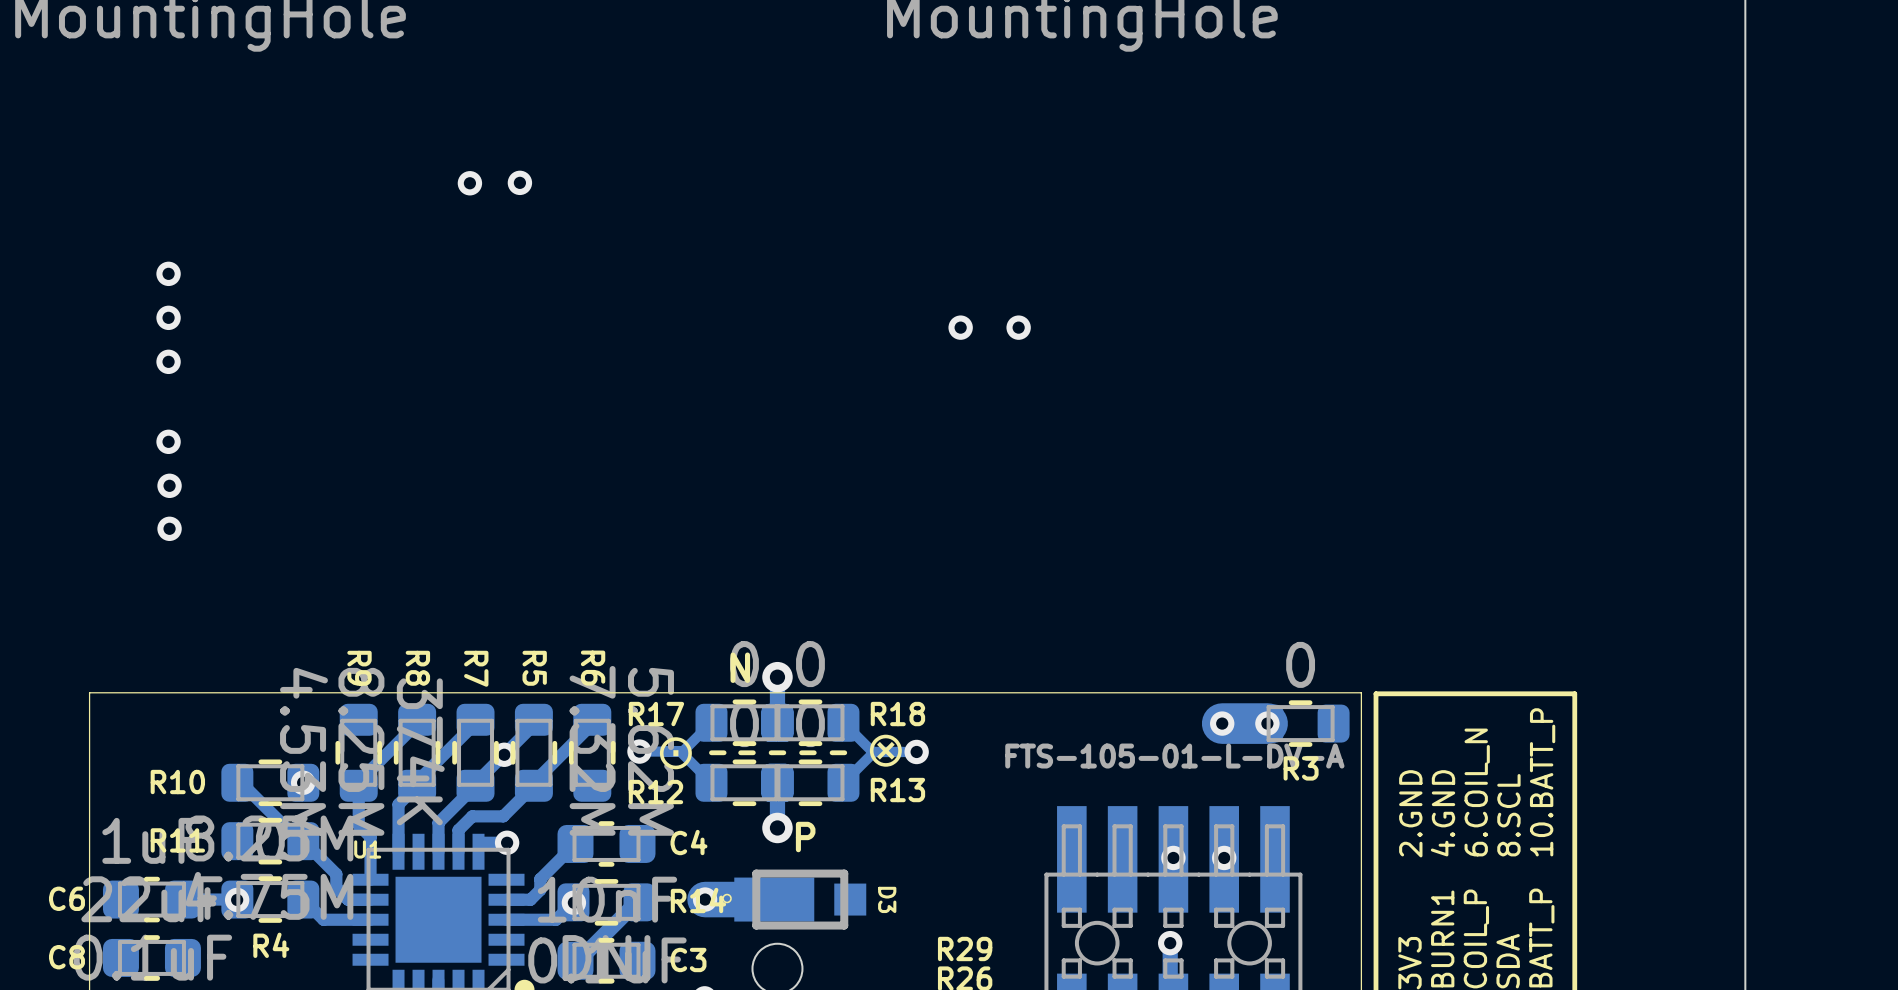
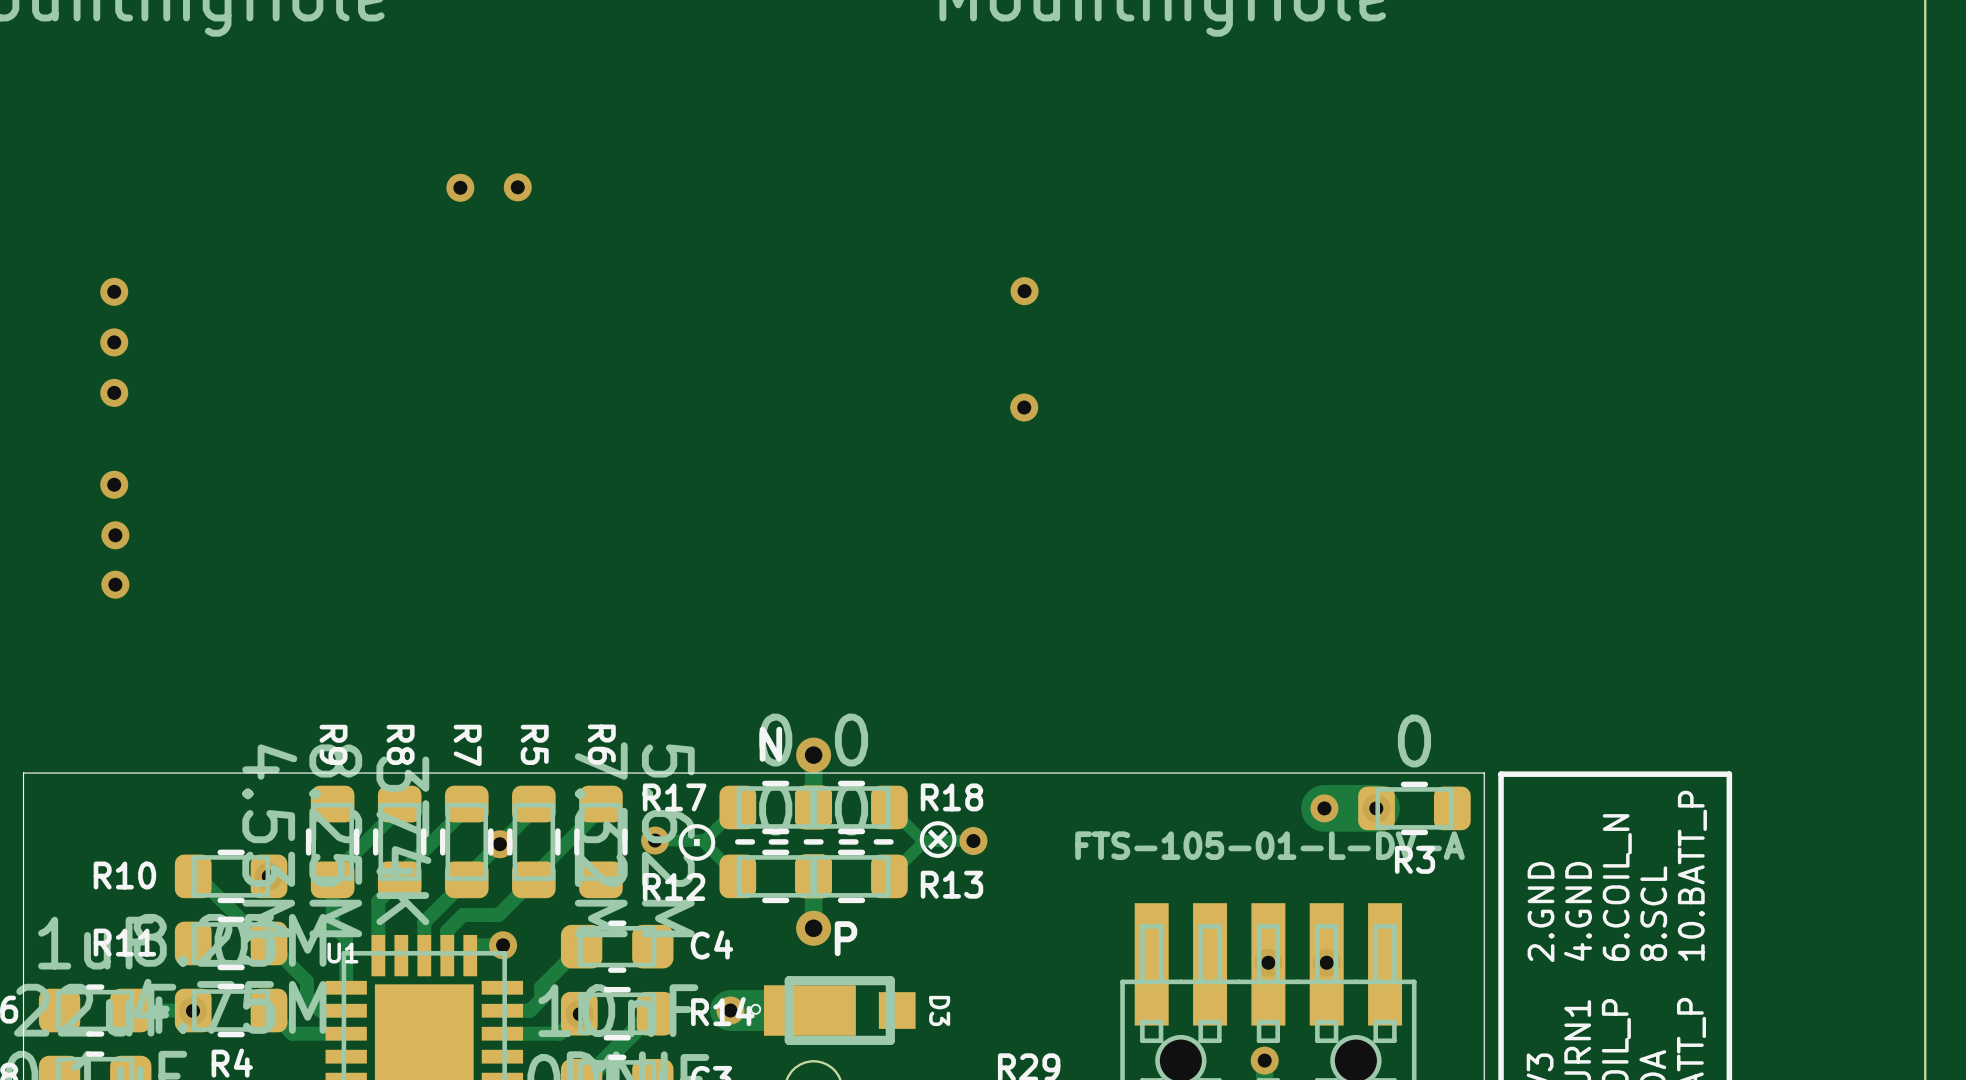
via: none -> (1024, 291)
via: (960, 327) -> none
via: (1018, 327) -> none
via: none -> (1024, 407)

